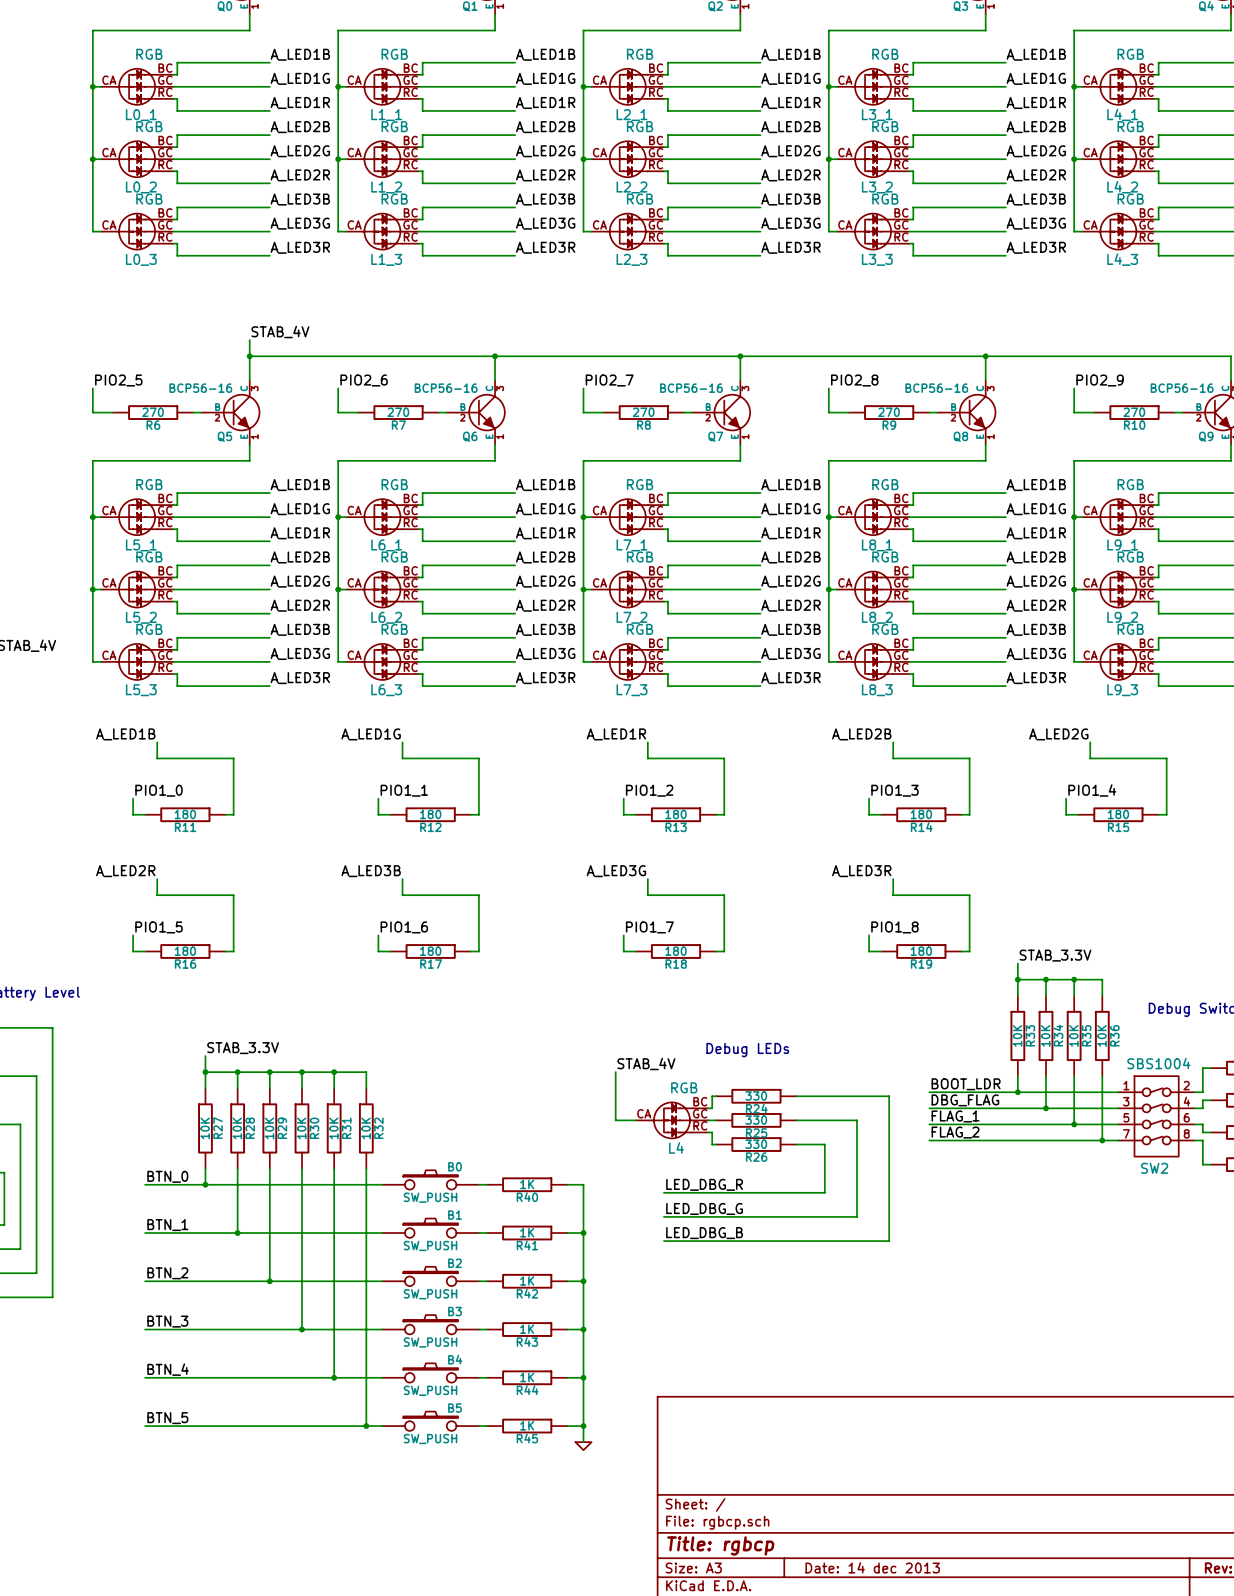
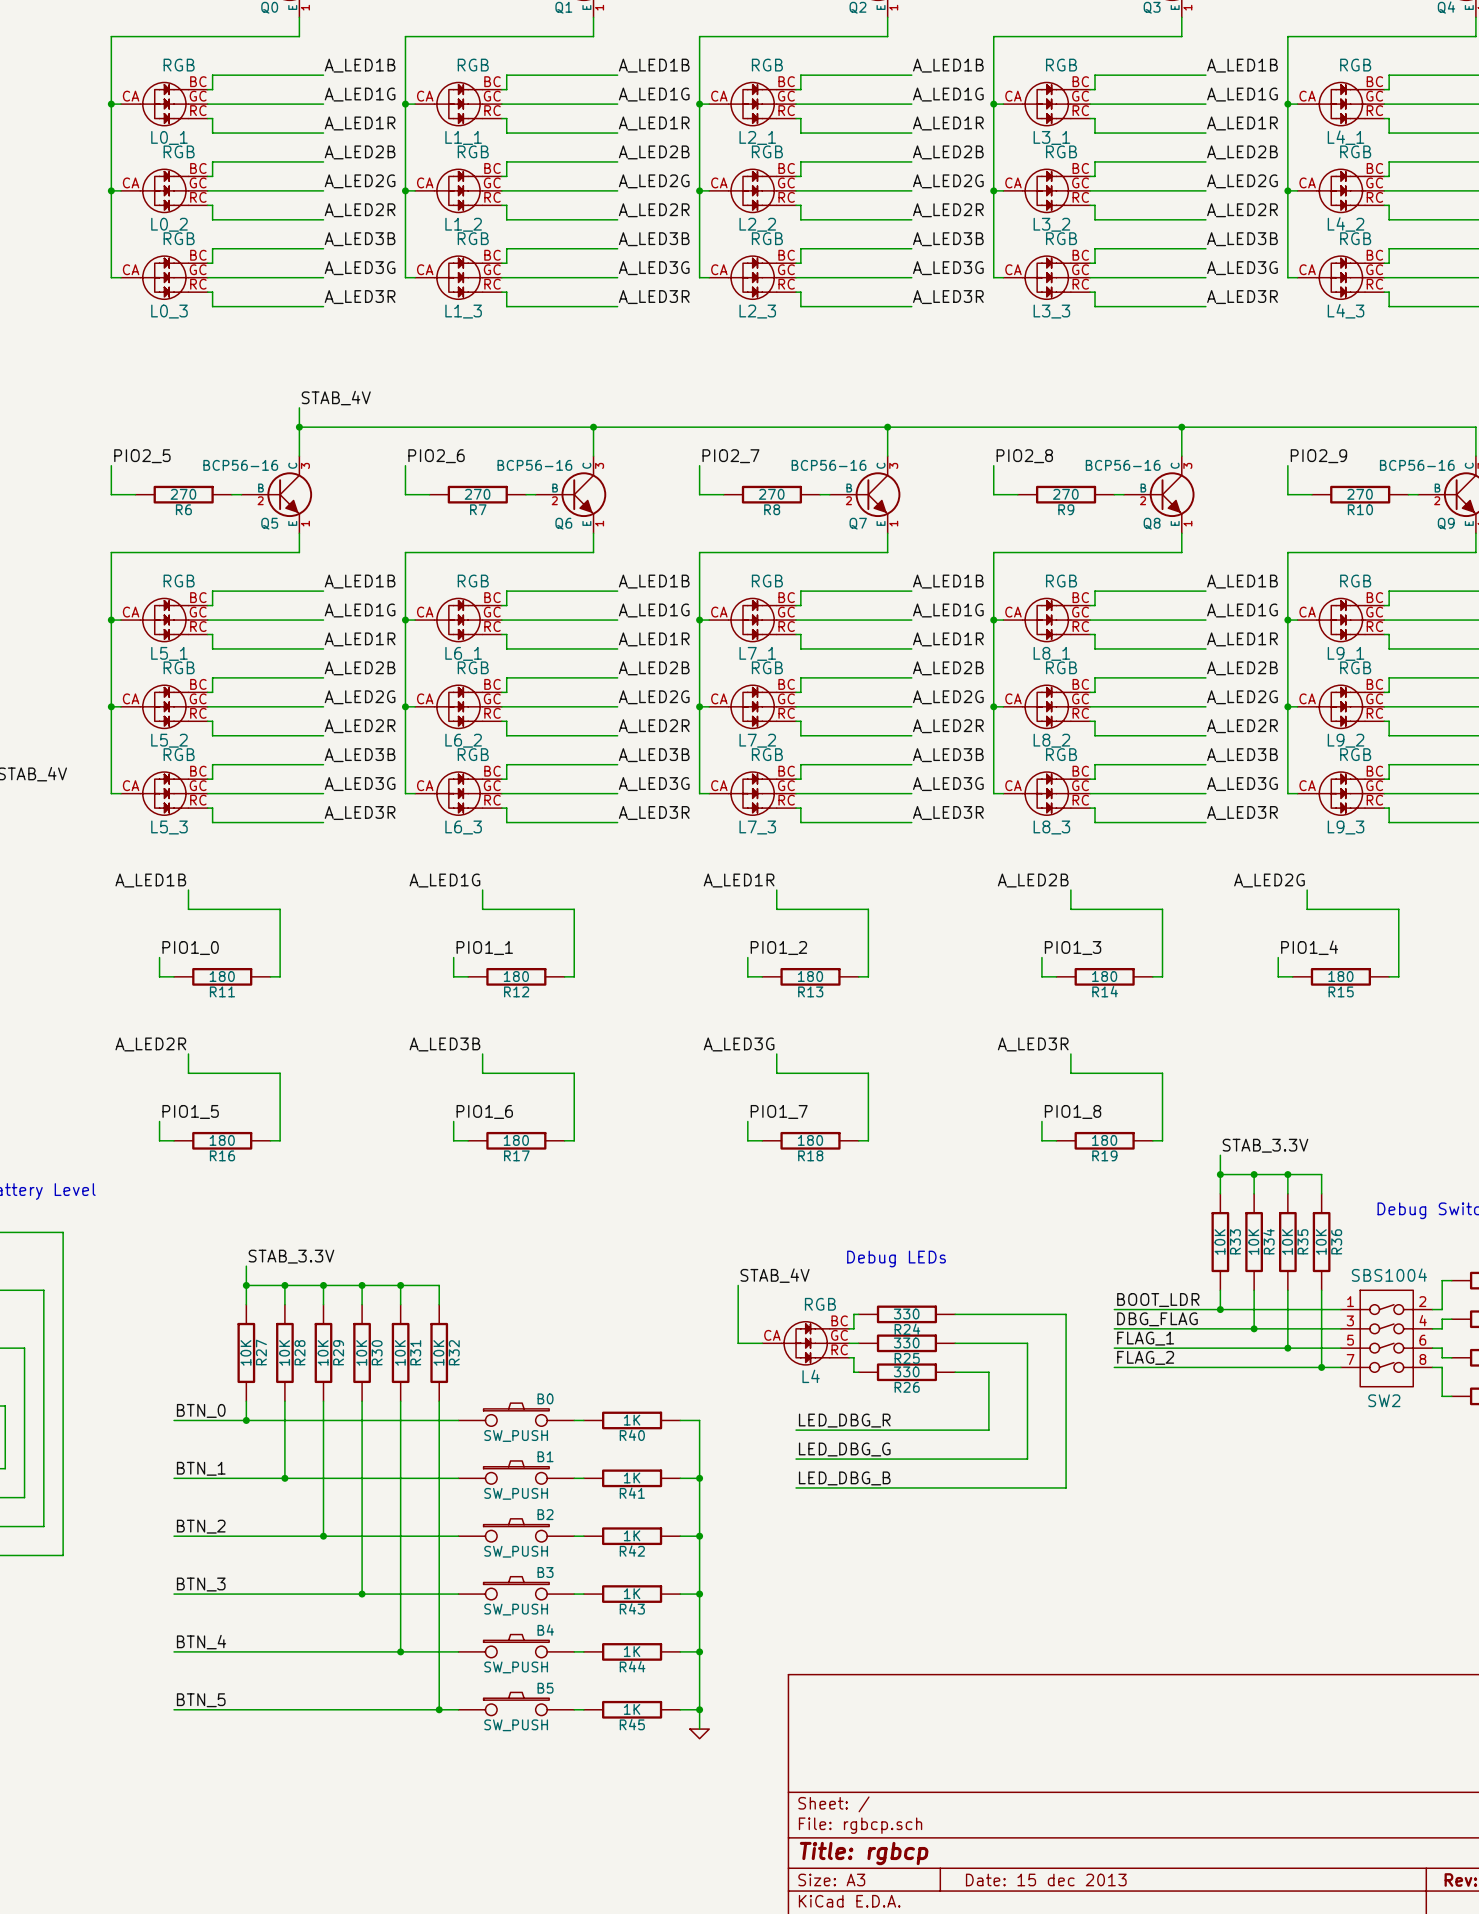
title block: Date: 14 dec 2013 (872, 1567) -> Date: 15 dec 2013 (1046, 1879)

